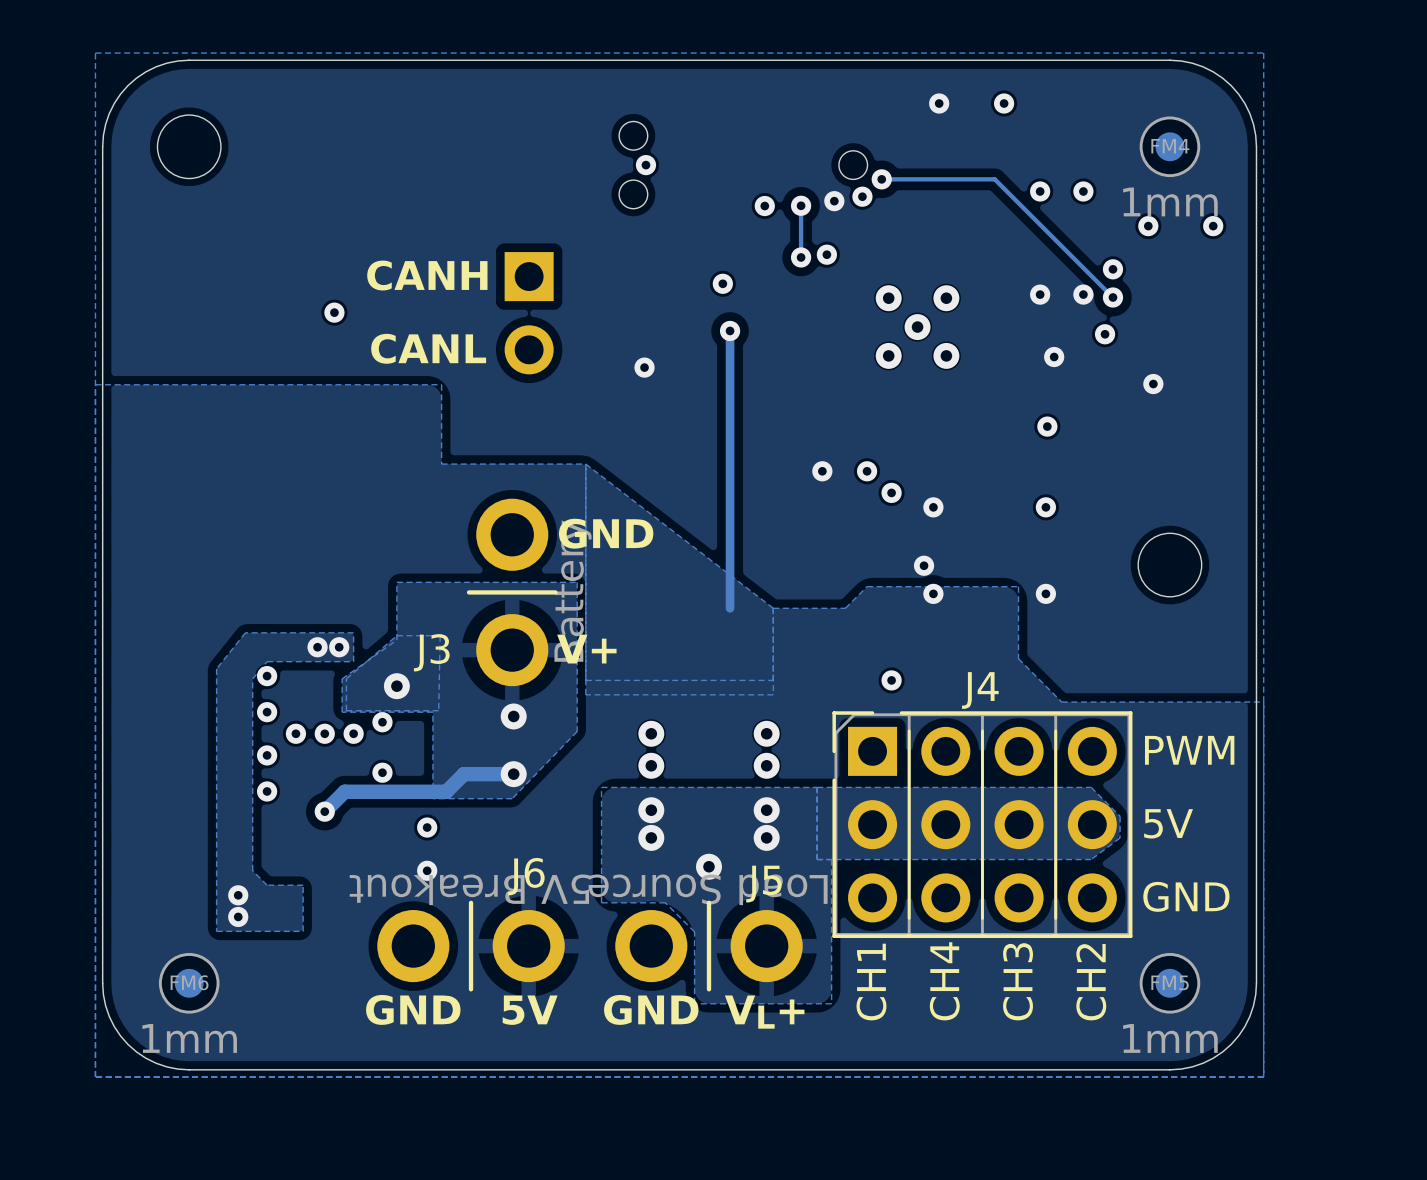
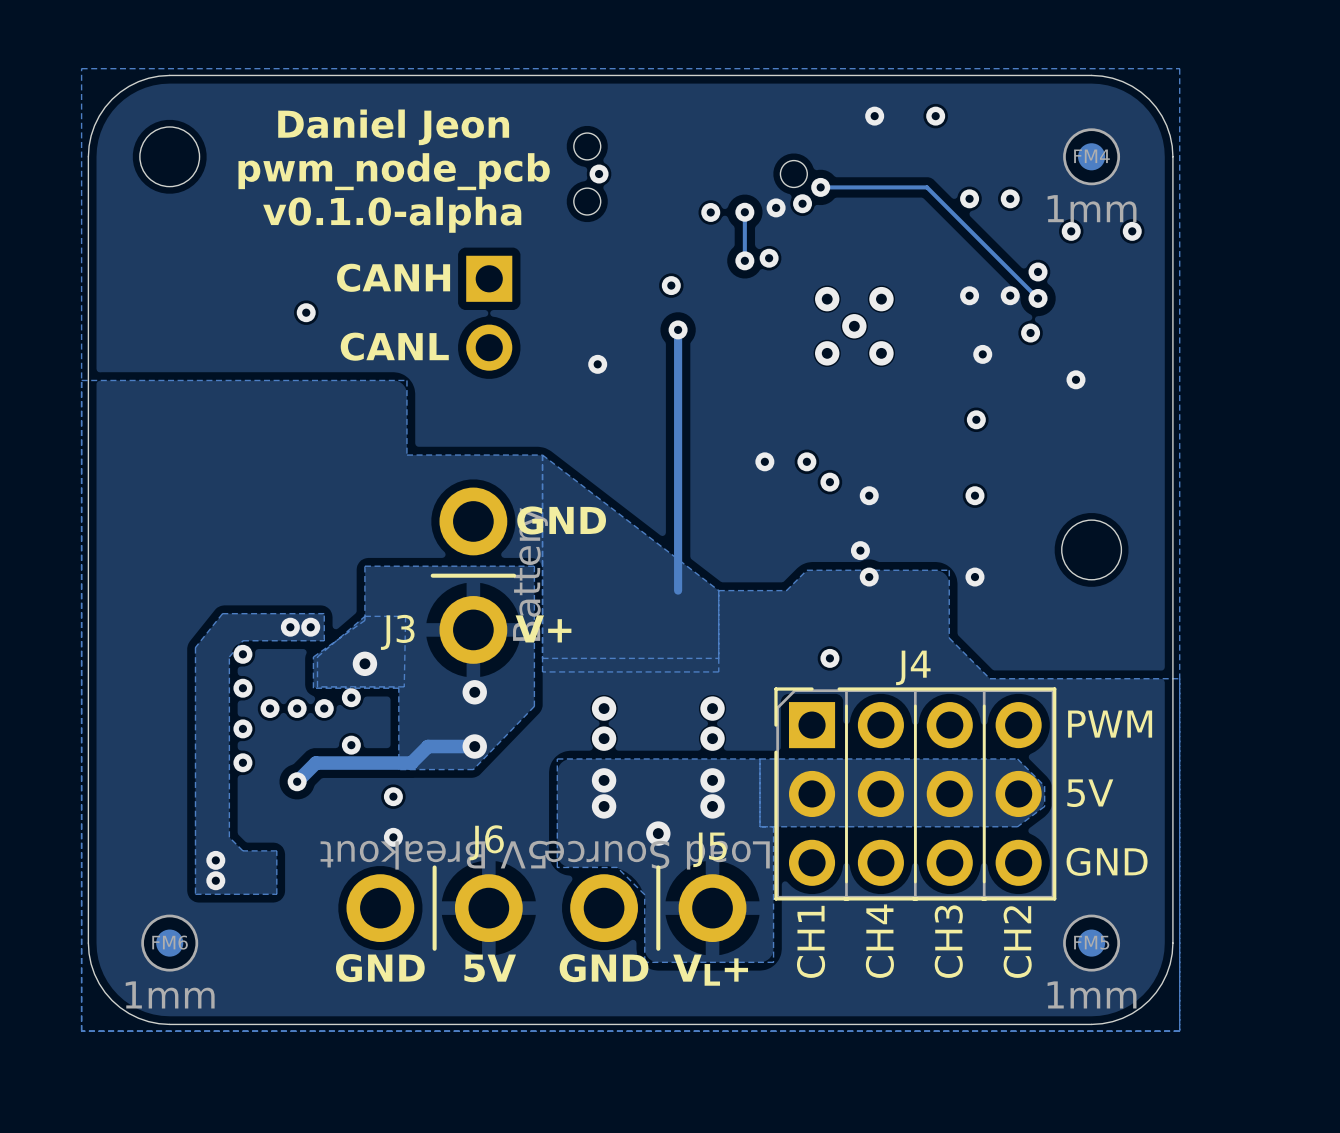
text: none -> Daniel Jeon (393, 127)
text: none -> pwm_node_pcb (394, 171)
text: none -> v0.1.0-alpha (392, 214)

